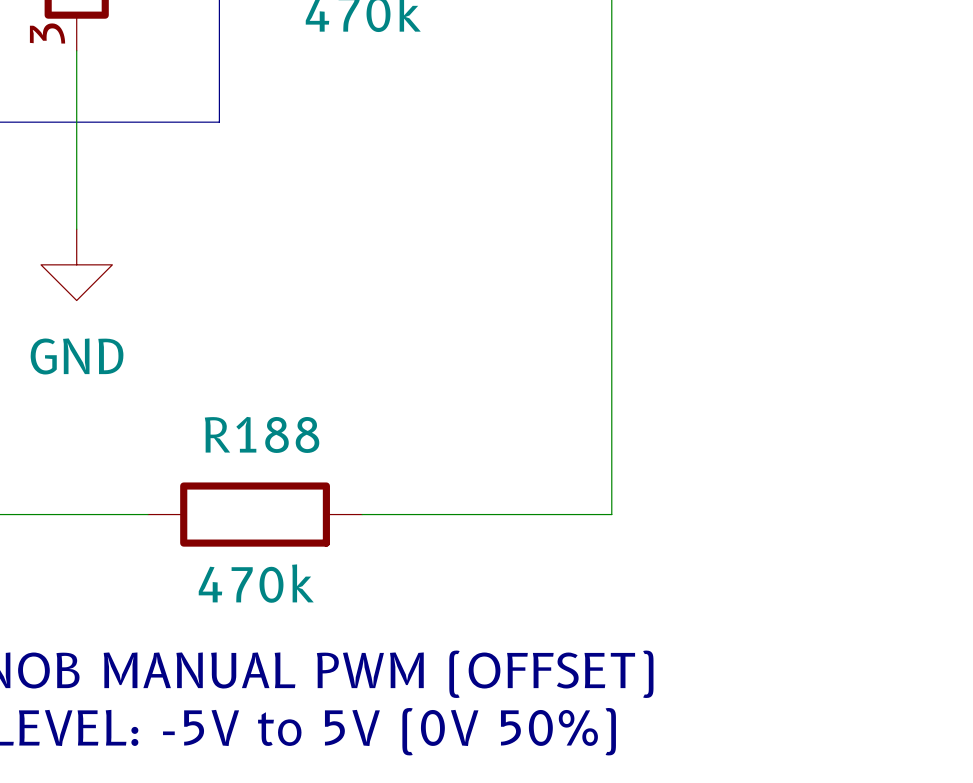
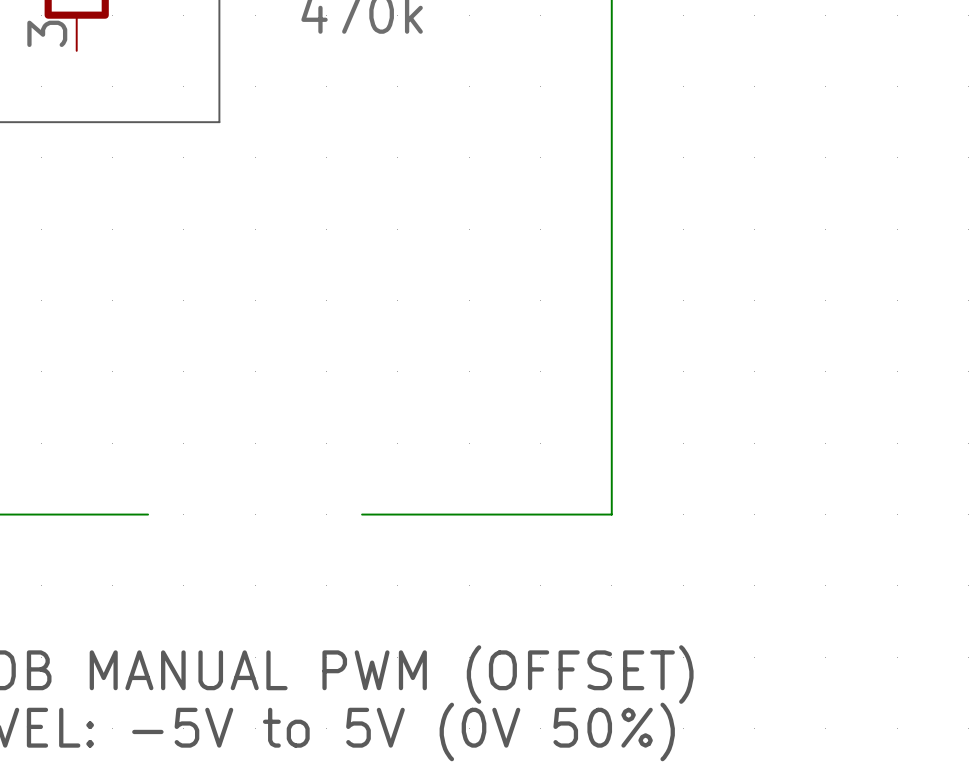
wire: (76, 50) (76, 229) -> none
power symbol: GND (76, 264) -> none
R188: 470k (255, 514) -> none

